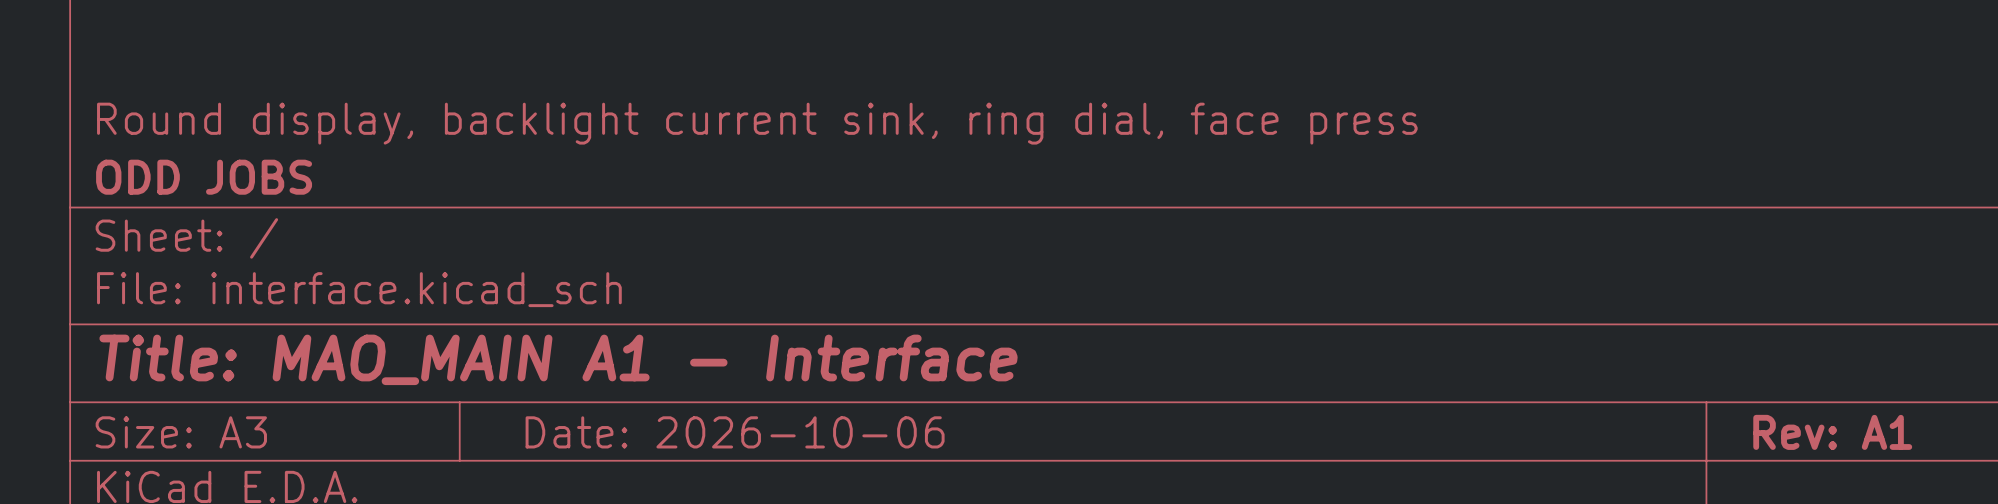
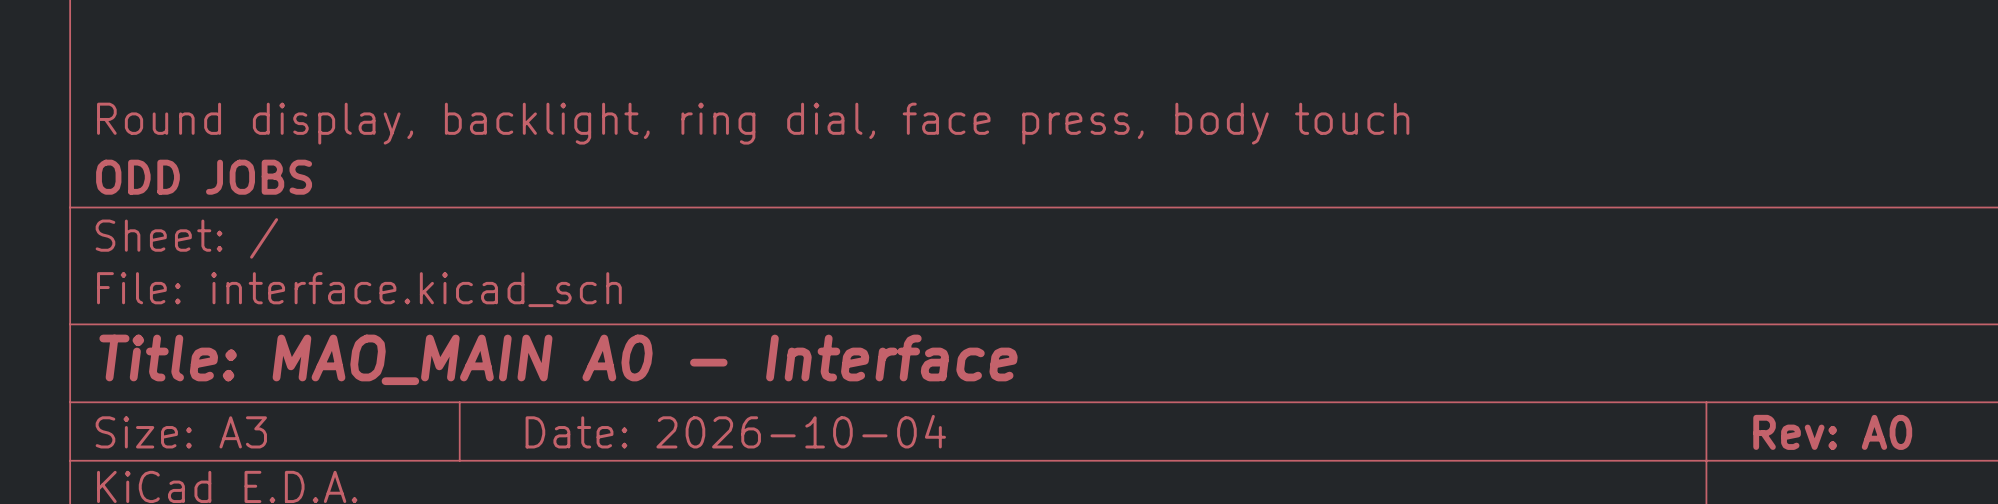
title block: Round display, backlight current sink, ring dial, face press (757, 123) -> Round display, backlight, ring dial, face press, body touch (753, 123)
title block: Title: MAO_MAIN A1 - Interface (558, 359) -> Title: MAO_MAIN A0 - Interface (558, 359)
title block: Date: 2026-10-06 (735, 432) -> Date: 2026-10-04 (735, 431)
title block: Rev: A1 (1832, 432) -> Rev: A0 (1832, 432)

